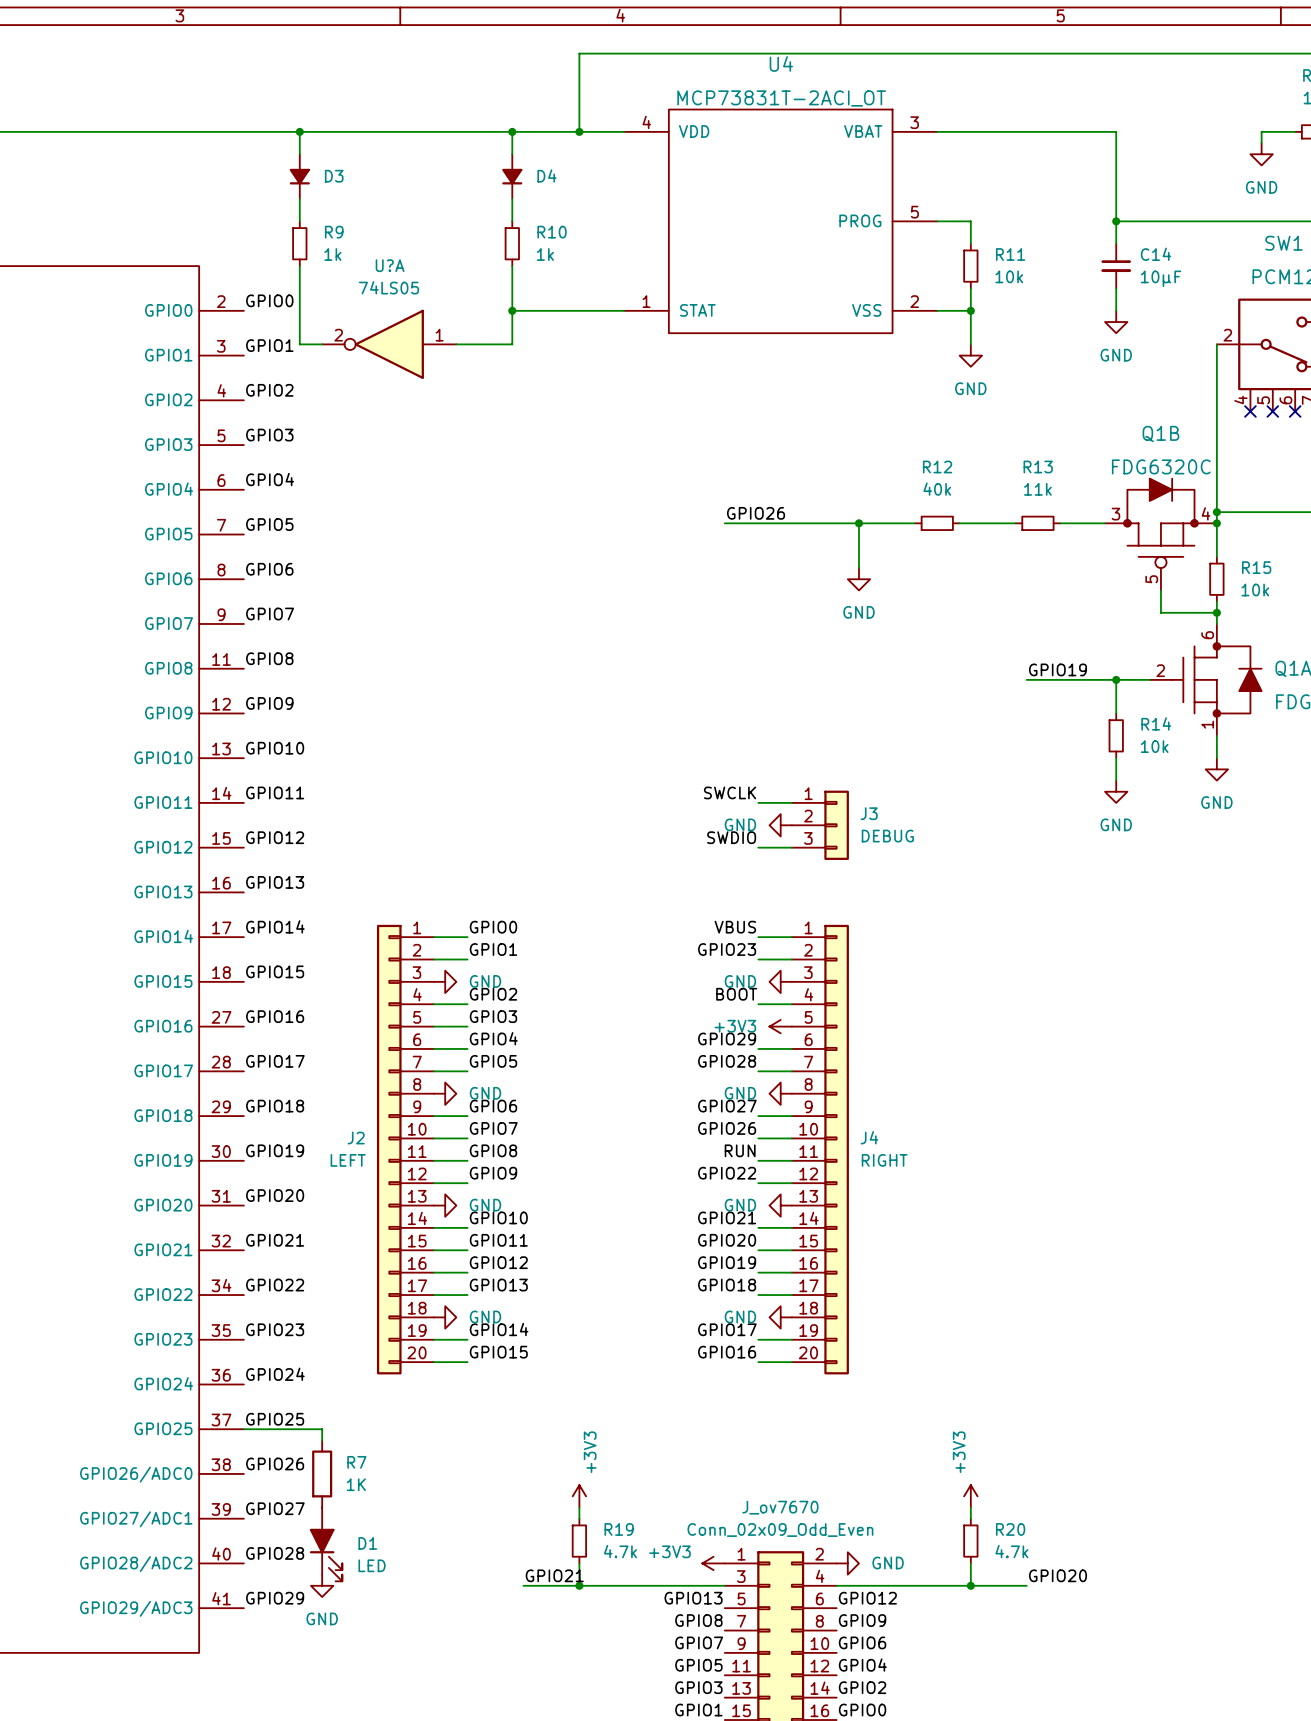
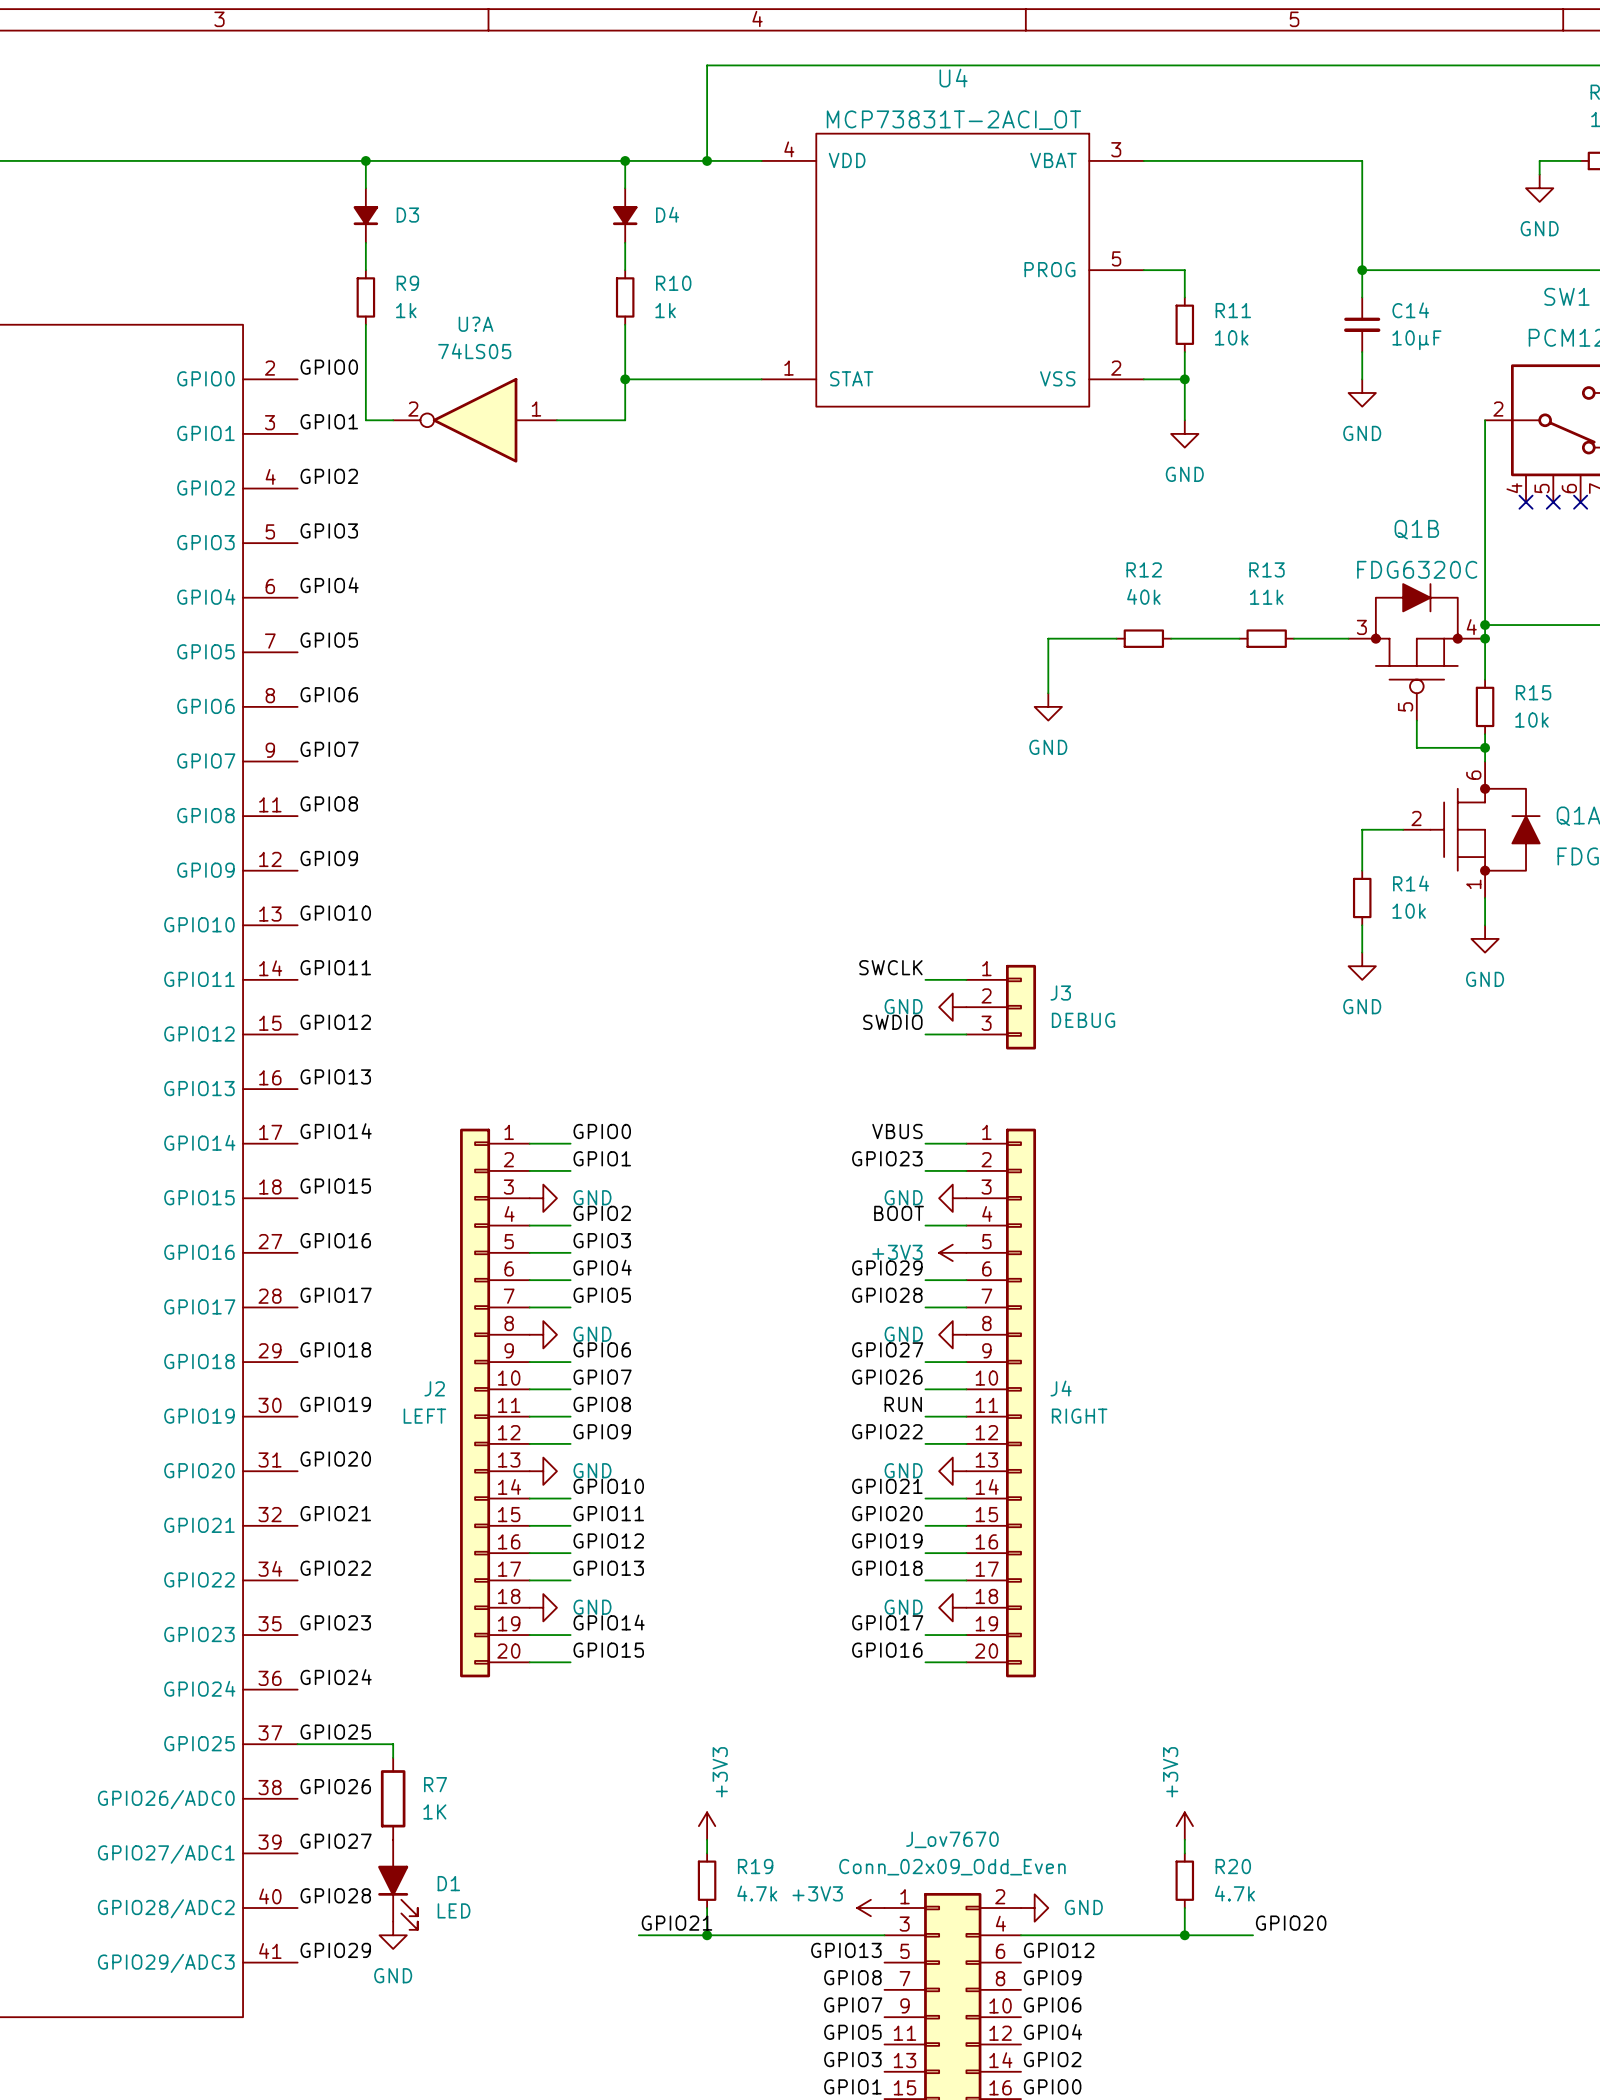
label: GPIO26 (756, 513) -> none
wire: (724, 523) (858, 523) -> none
junction: (858, 523) -> none
label: GPIO19 (1057, 669) -> none
wire: (1026, 679) (1116, 679) -> none
junction: (1116, 679) -> none

